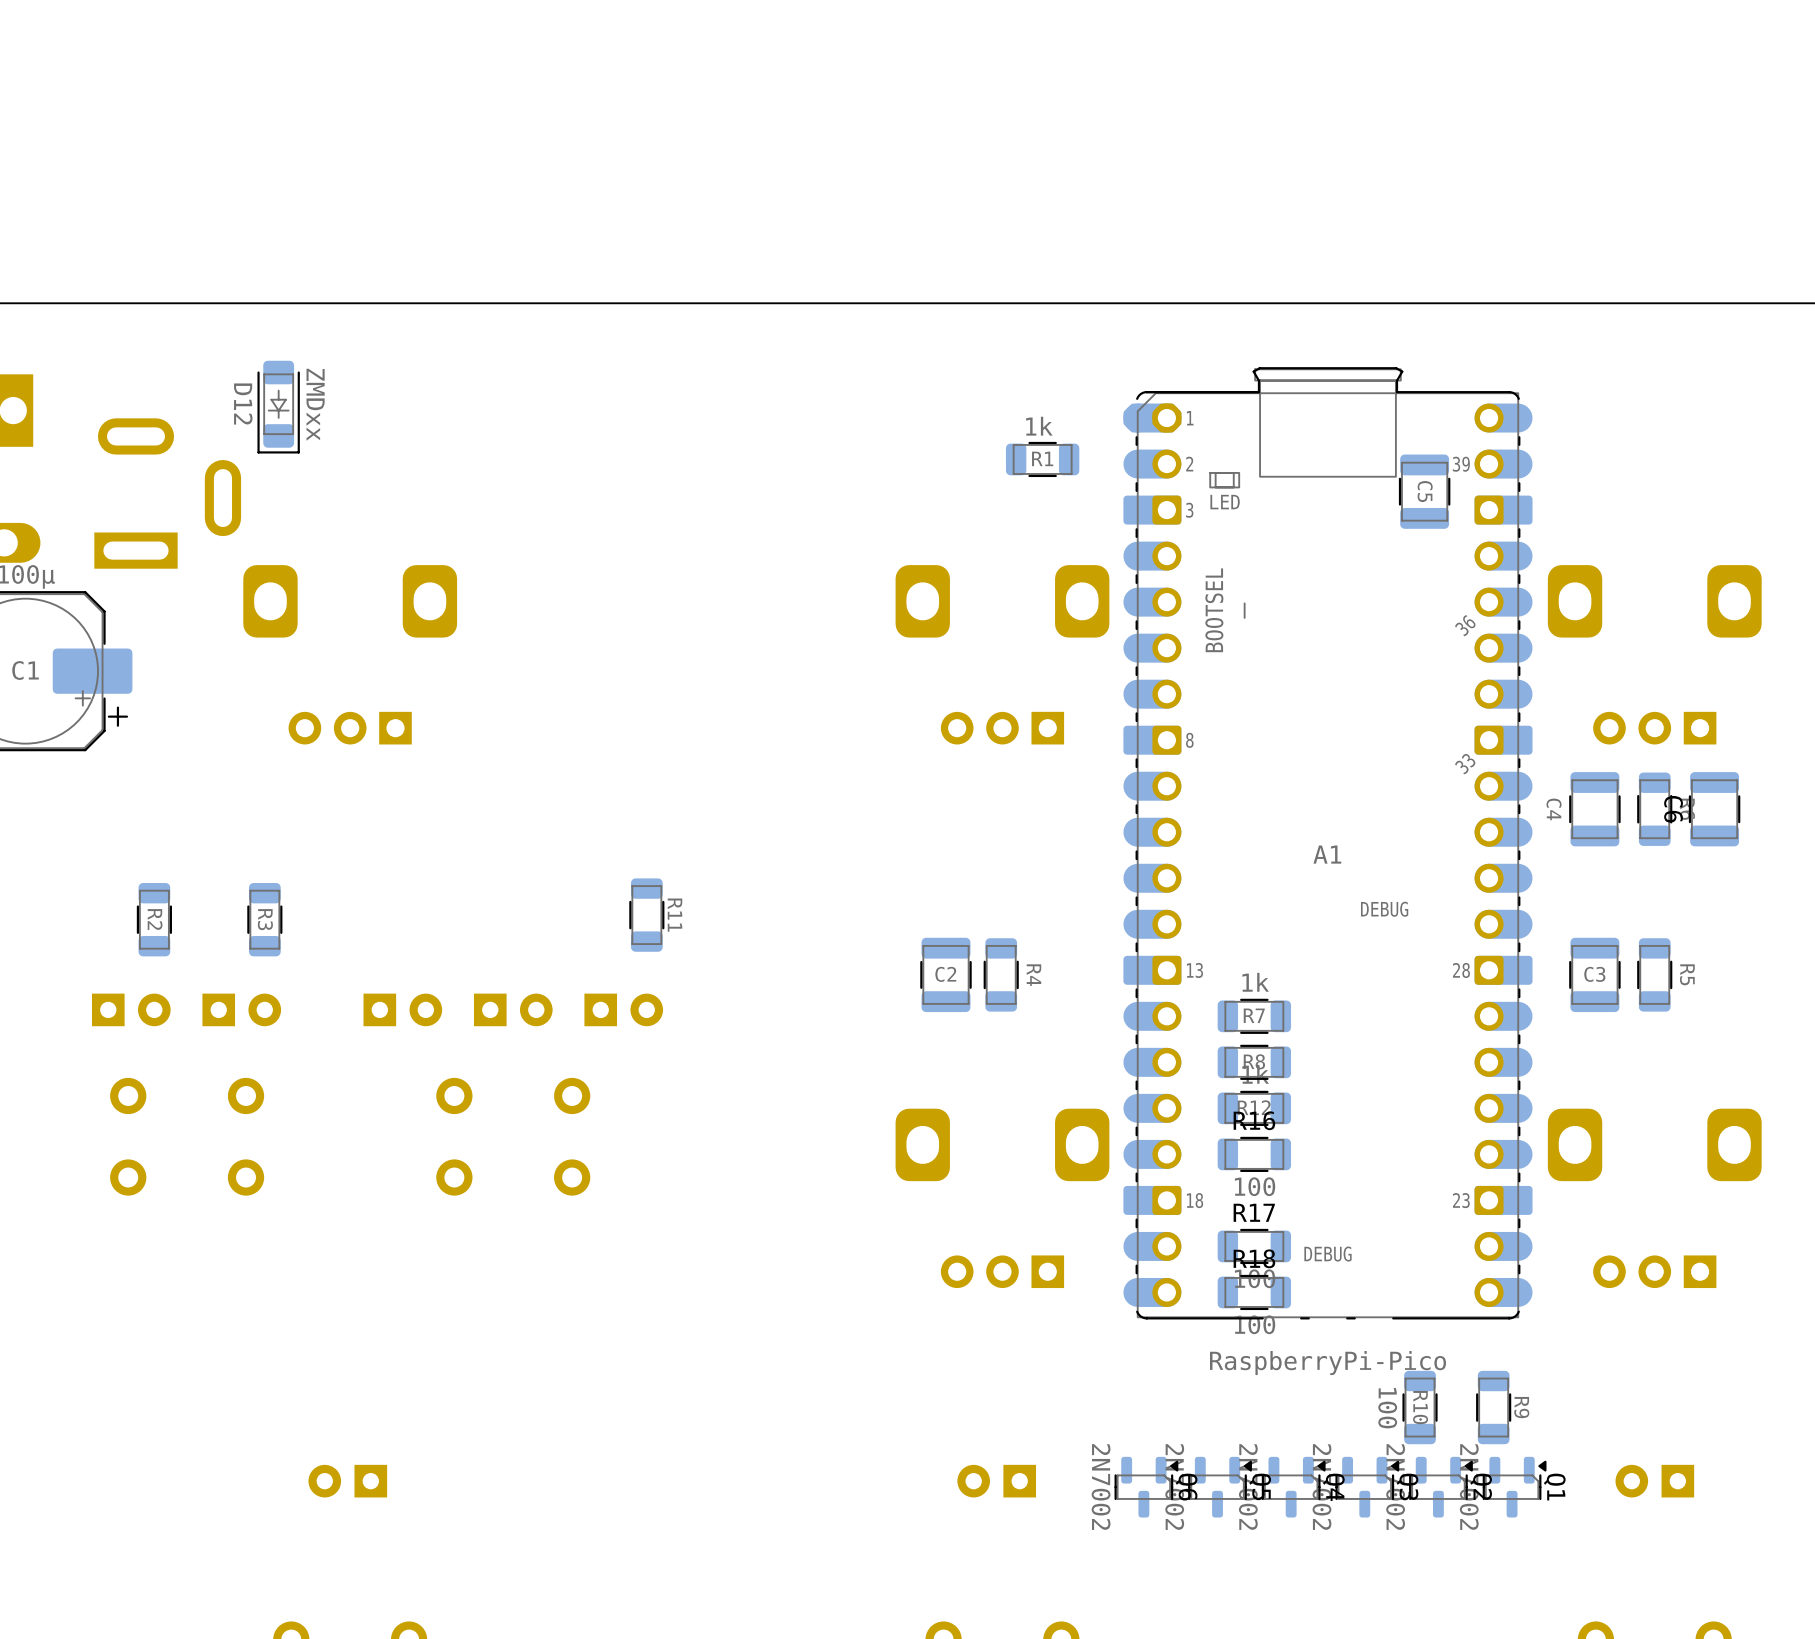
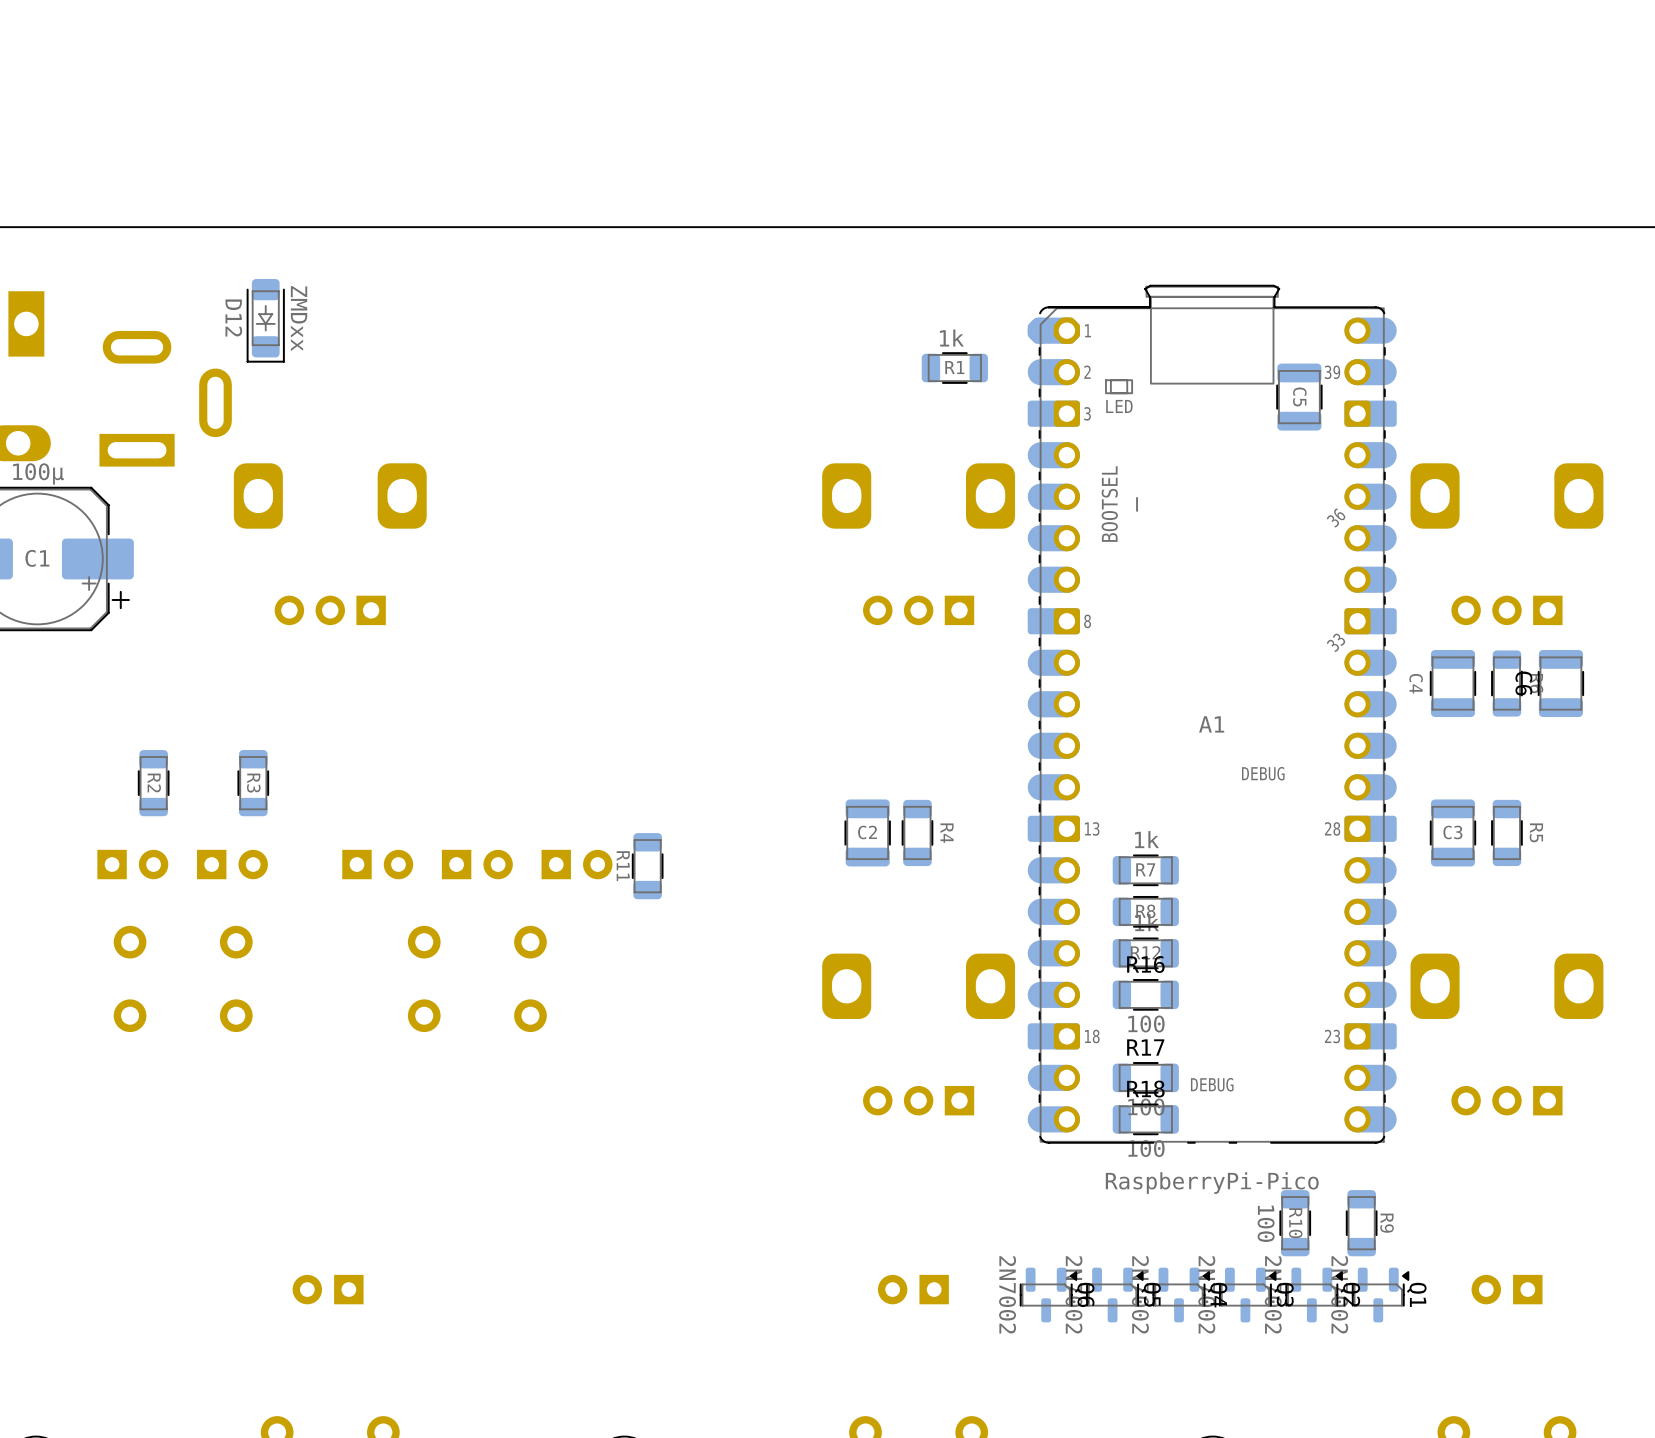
R11 position: (646, 915) -> (647, 866)
R11 name position: R11 (674, 915) -> R11 (623, 866)

